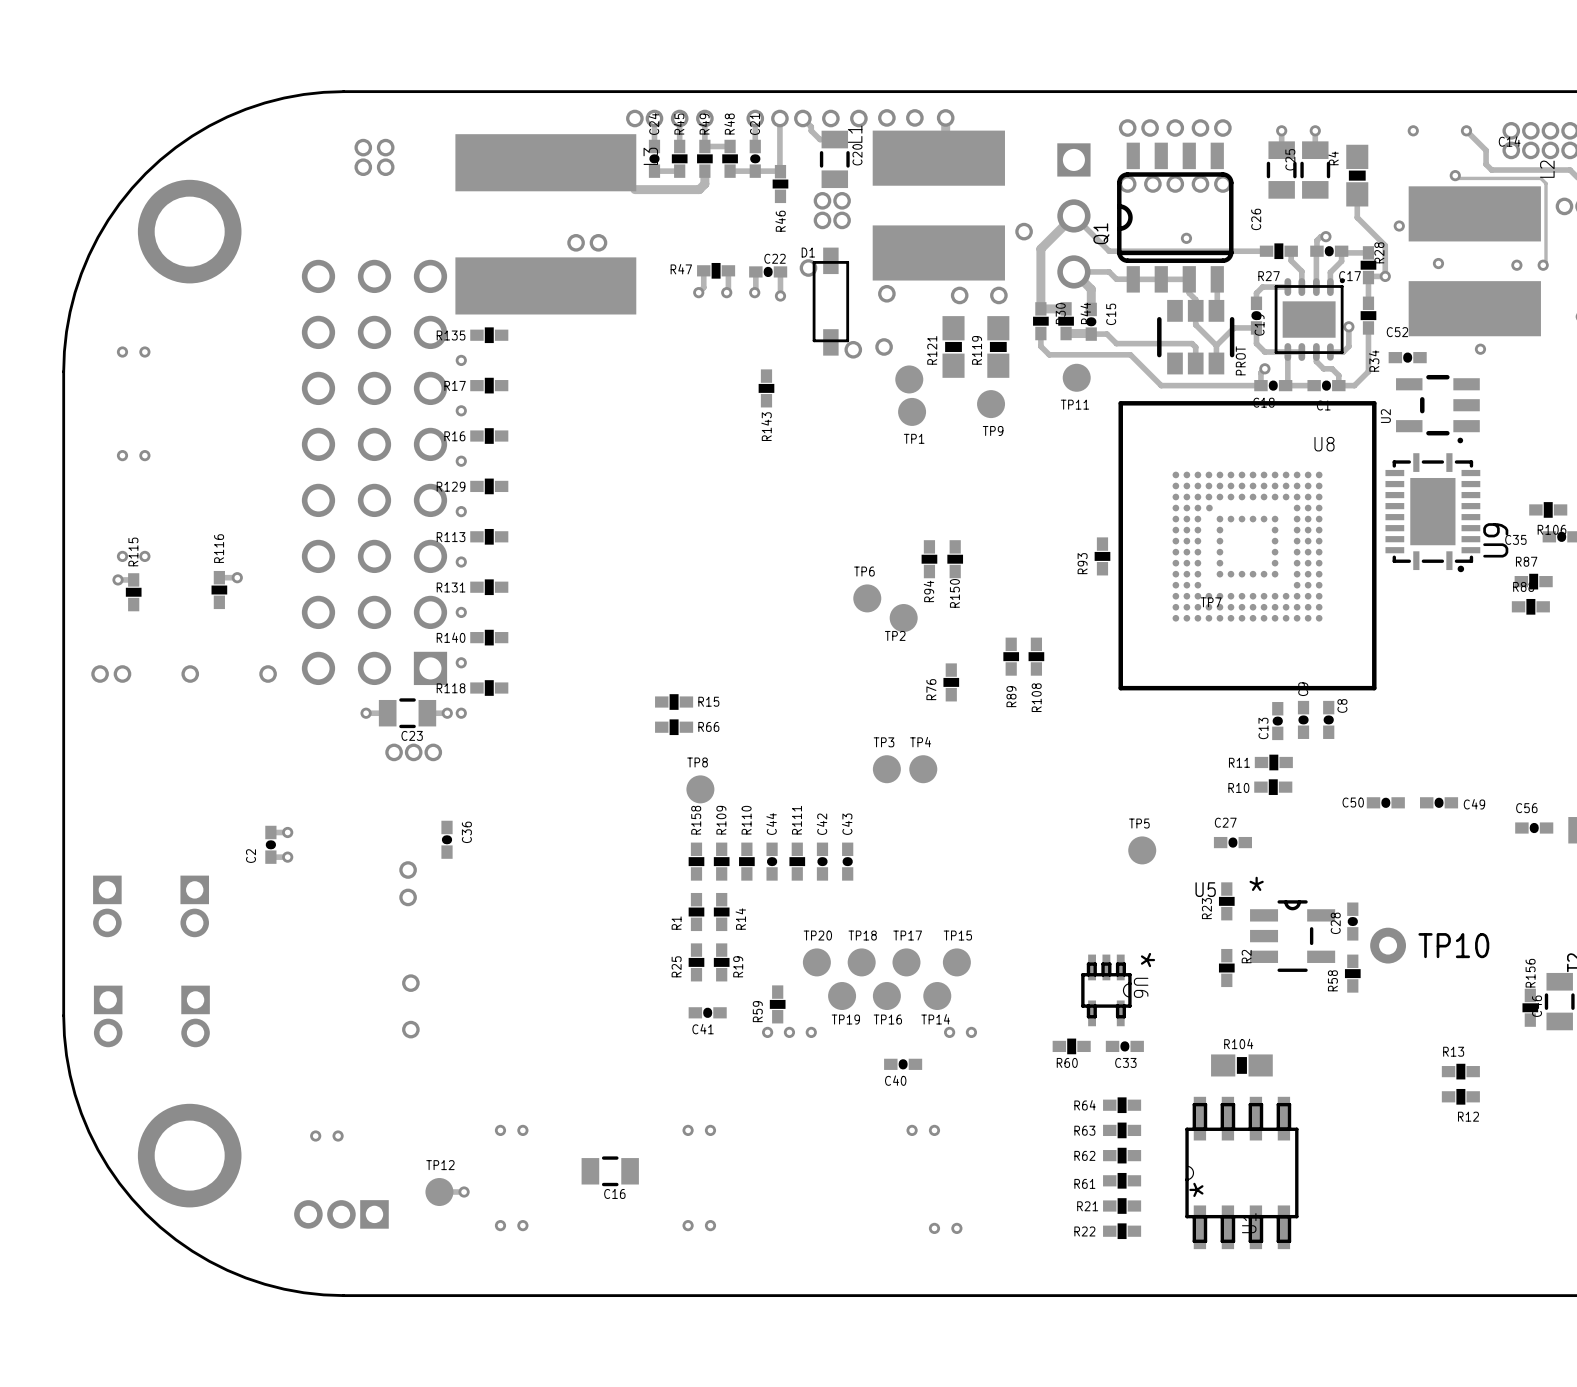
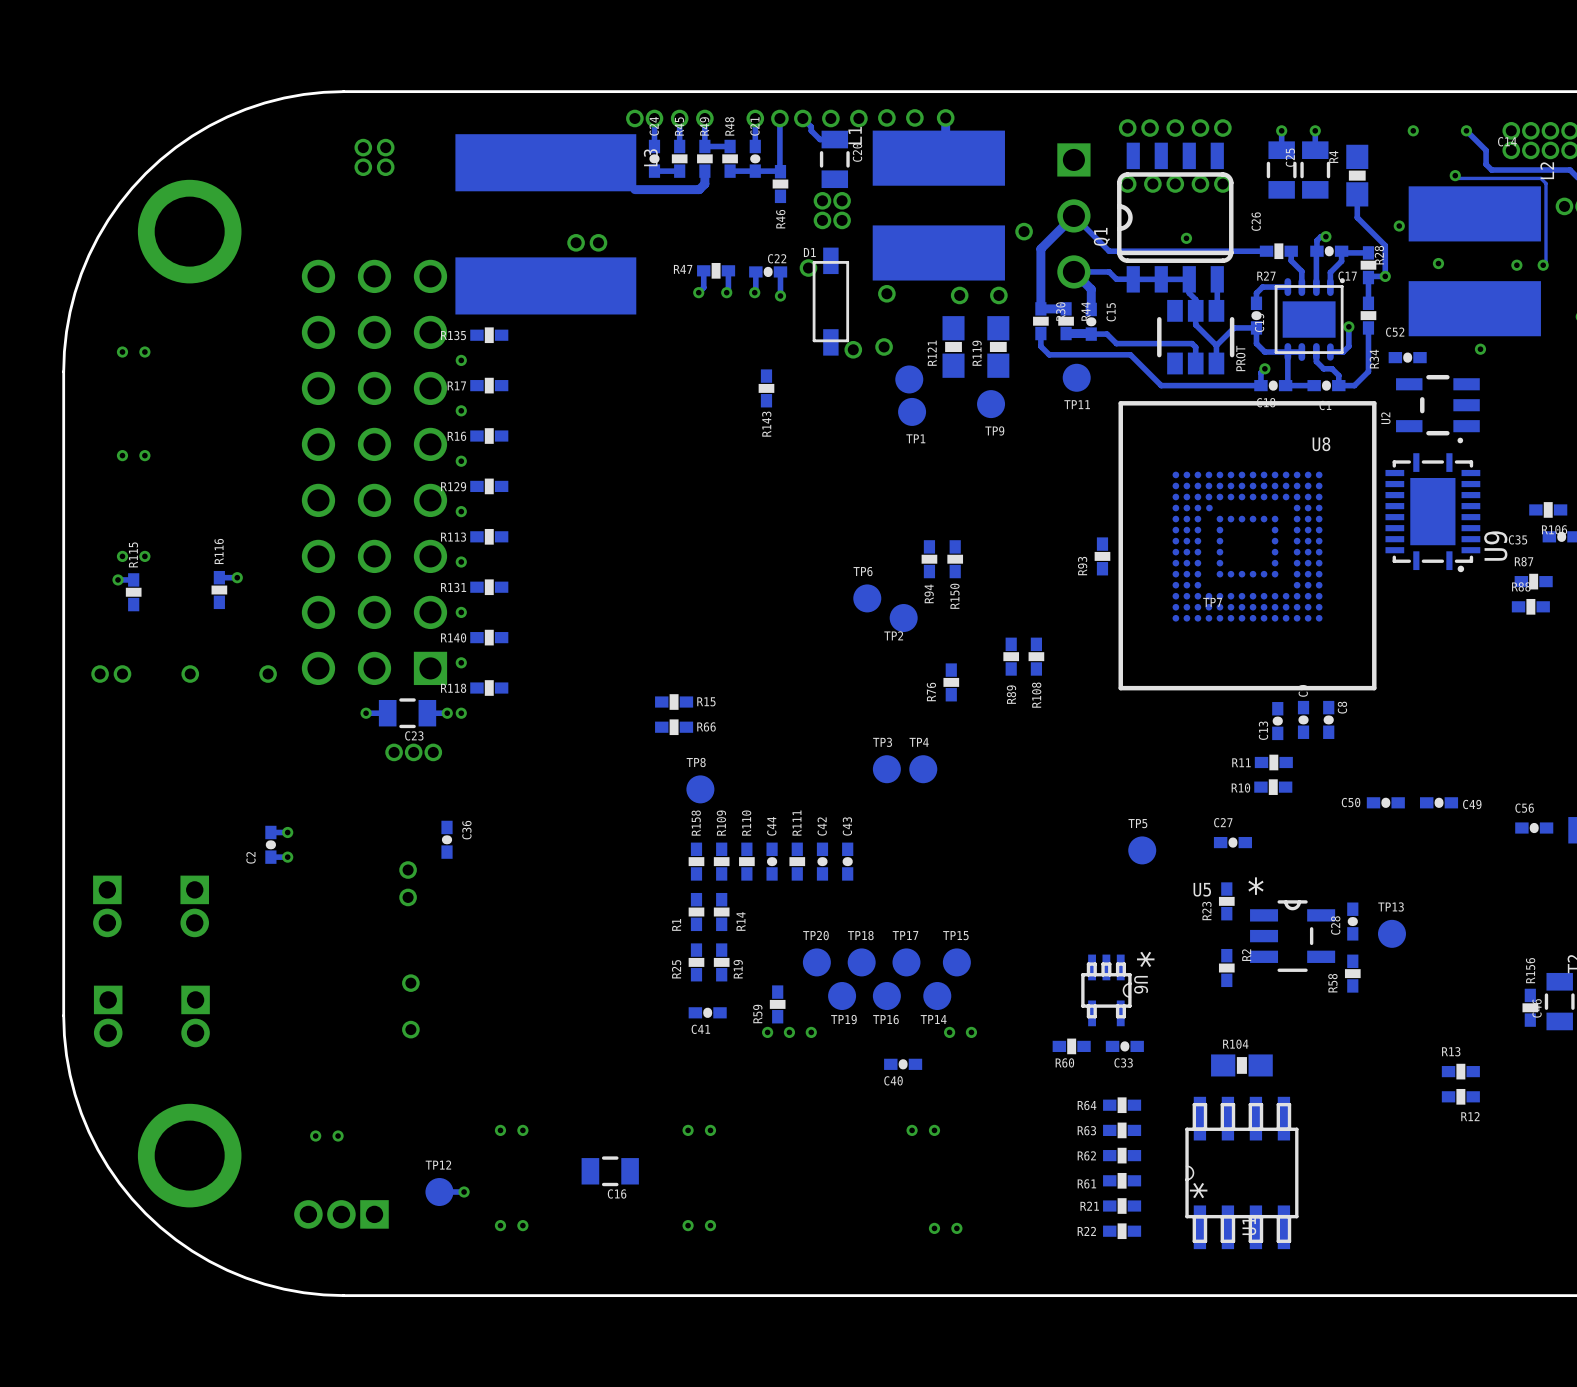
TP13: none -> (1391, 933)
TP10: (1388, 945) -> none

